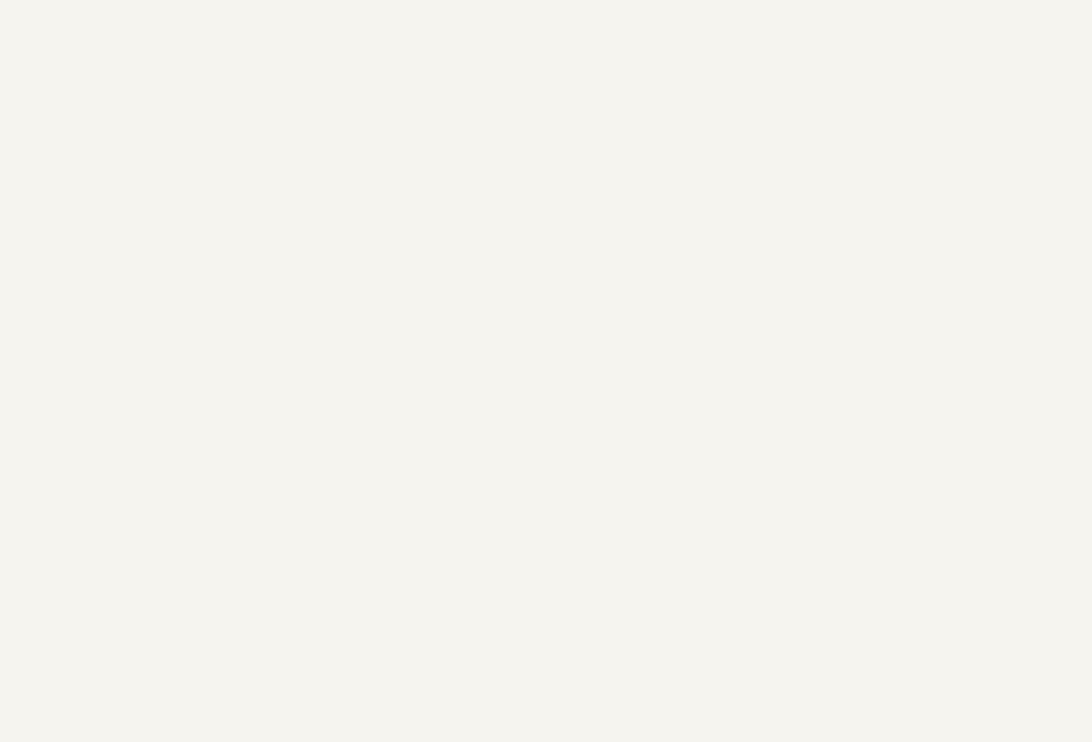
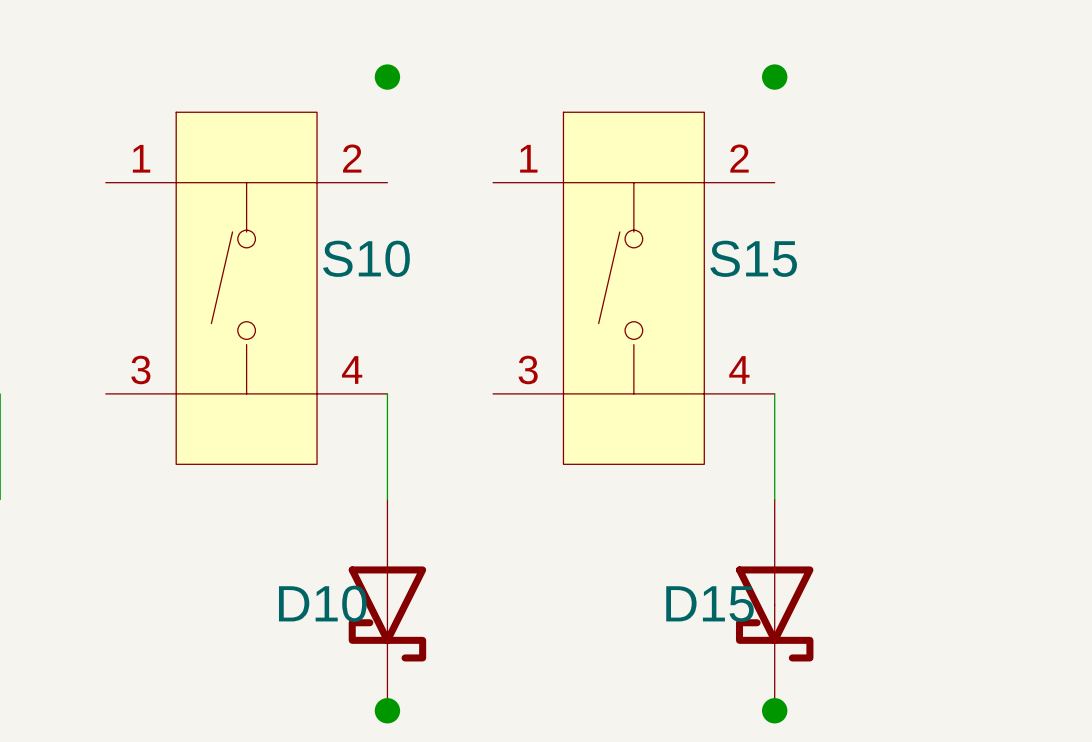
junction: none -> (387, 77)
junction: none -> (774, 77)
S10: none -> (246, 288)
S15: none -> (633, 288)
wire: none -> (0, 393) (0, 499)
wire: none -> (387, 393) (387, 499)
wire: none -> (774, 393) (774, 499)
D10: none -> (387, 605)
D15: none -> (774, 605)
junction: none -> (387, 710)
junction: none -> (774, 710)

